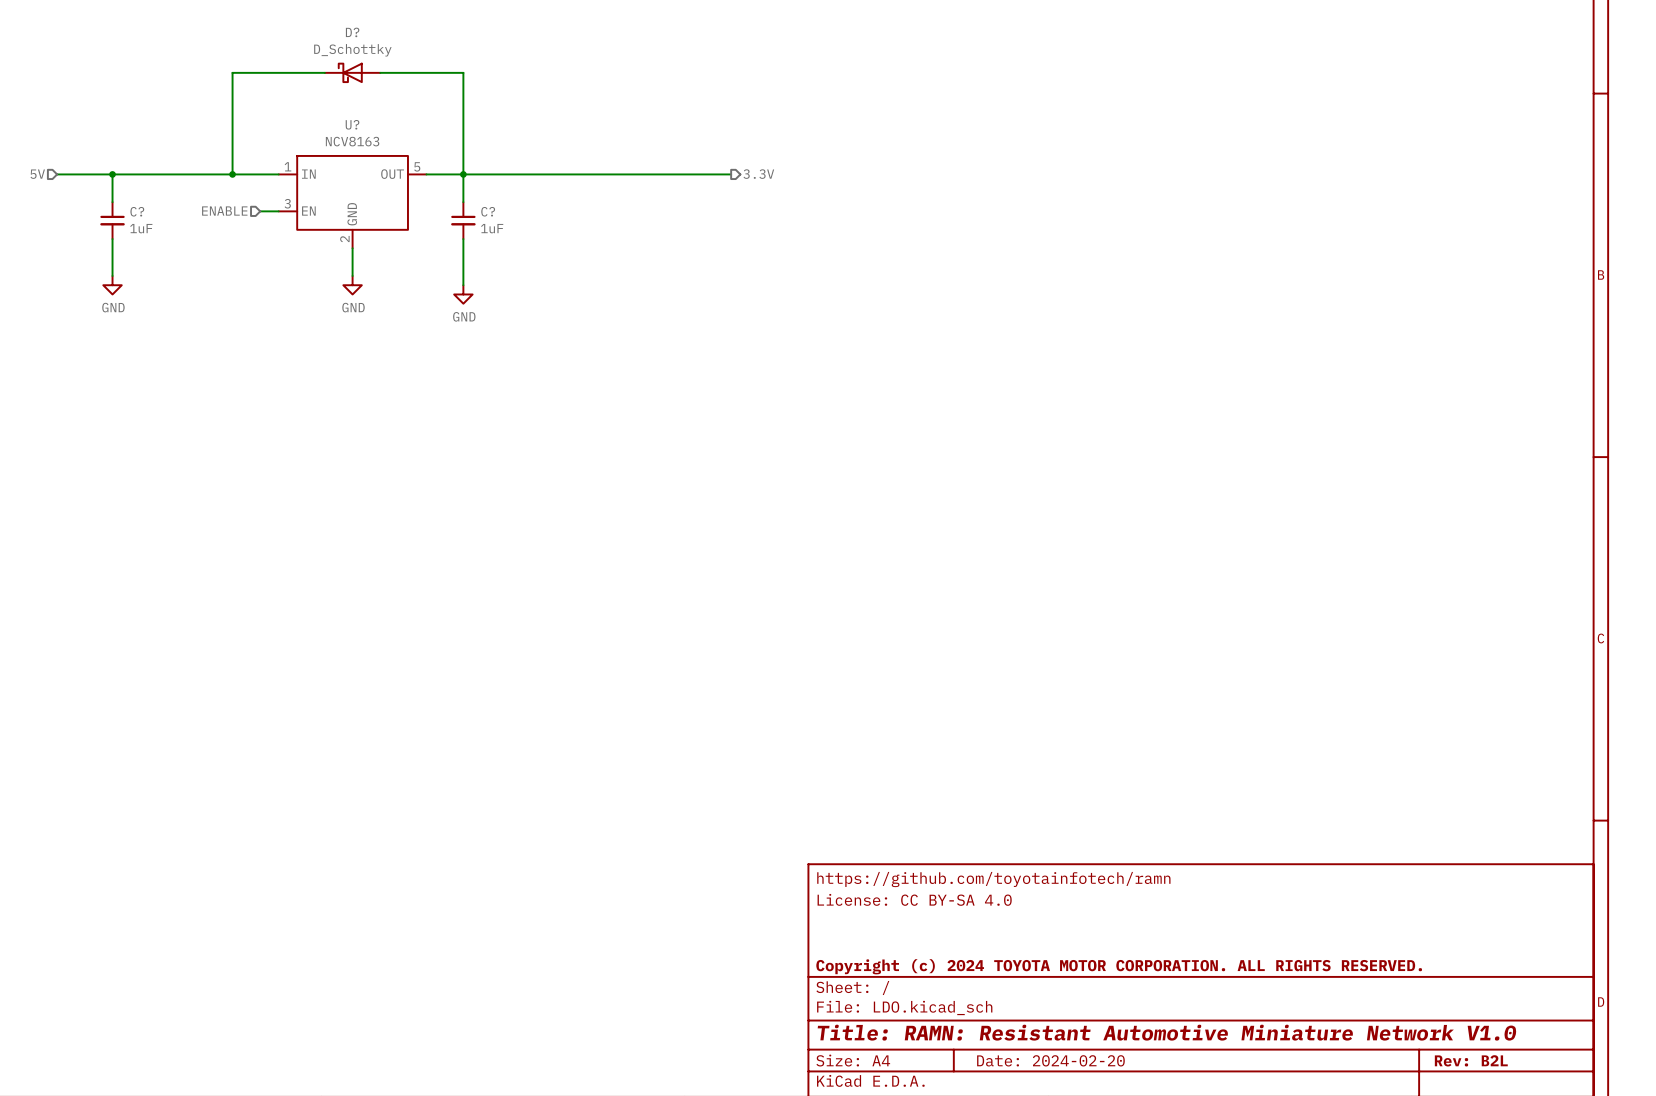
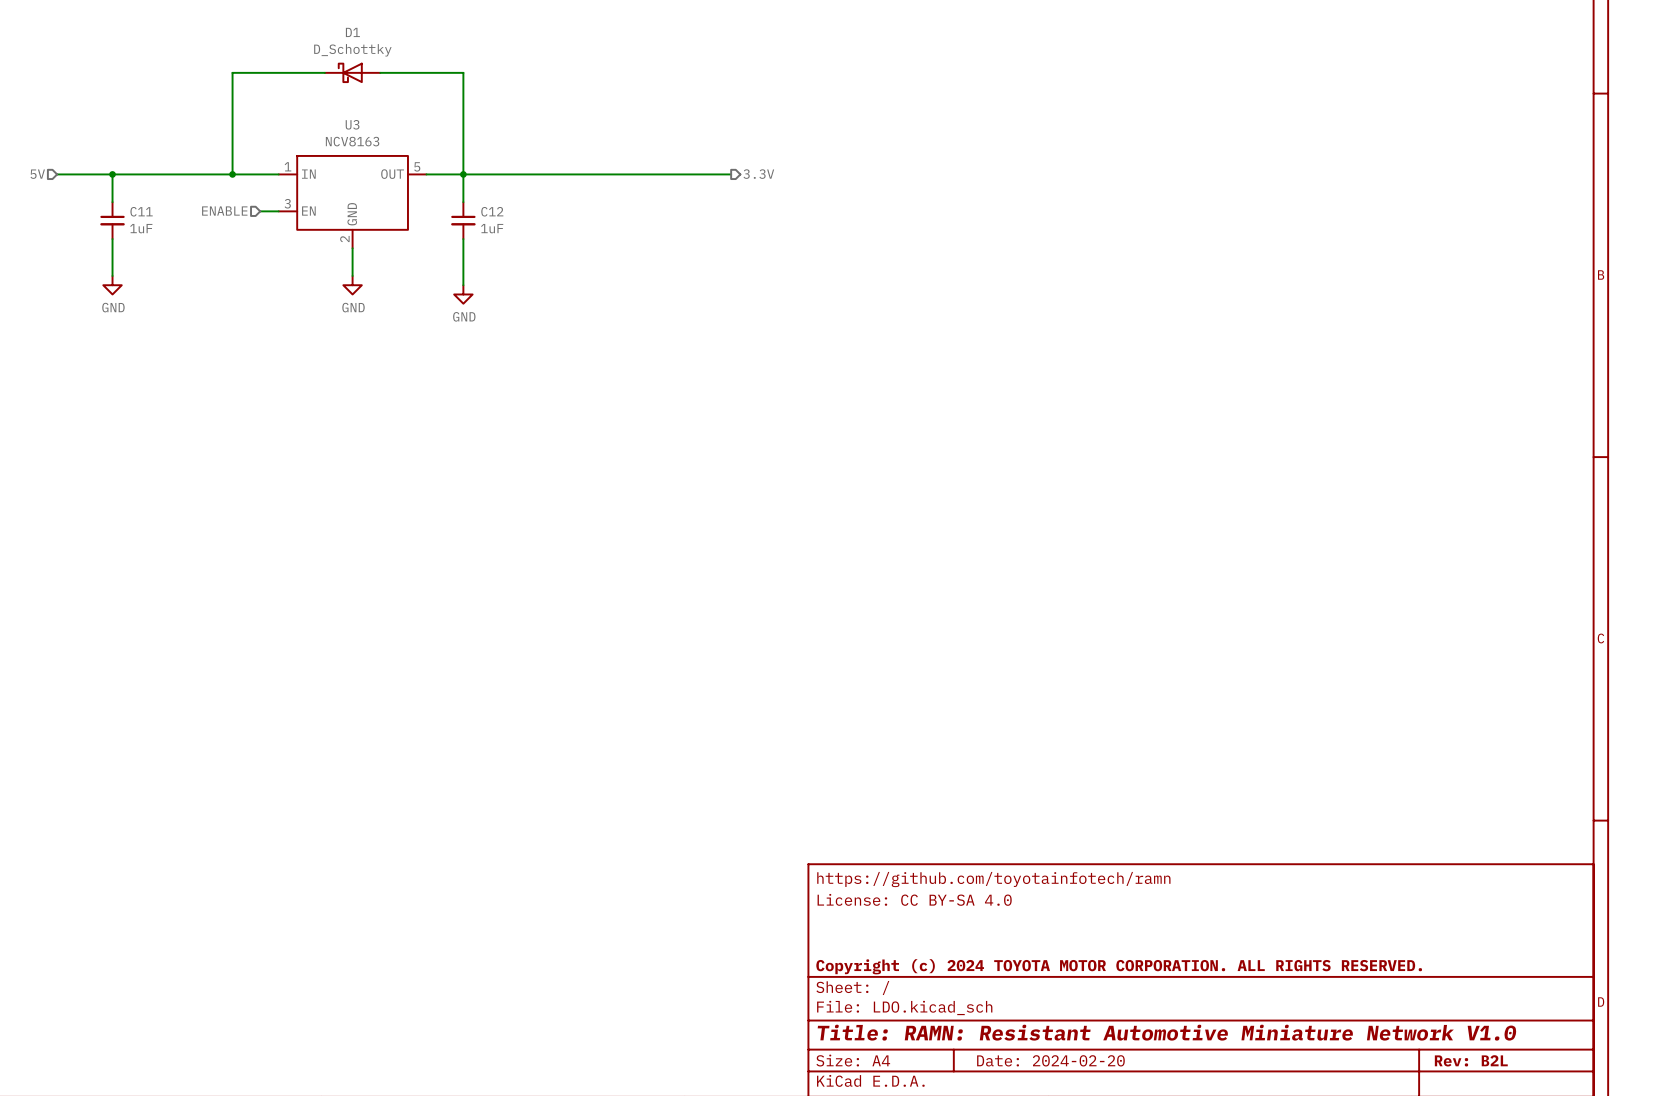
D? name: D? (352, 32) -> D1 (352, 32)
U? name: U? (352, 124) -> U3 (352, 124)
C? name: C? (137, 211) -> C11 (141, 211)
C? name: C? (488, 211) -> C12 (492, 211)

